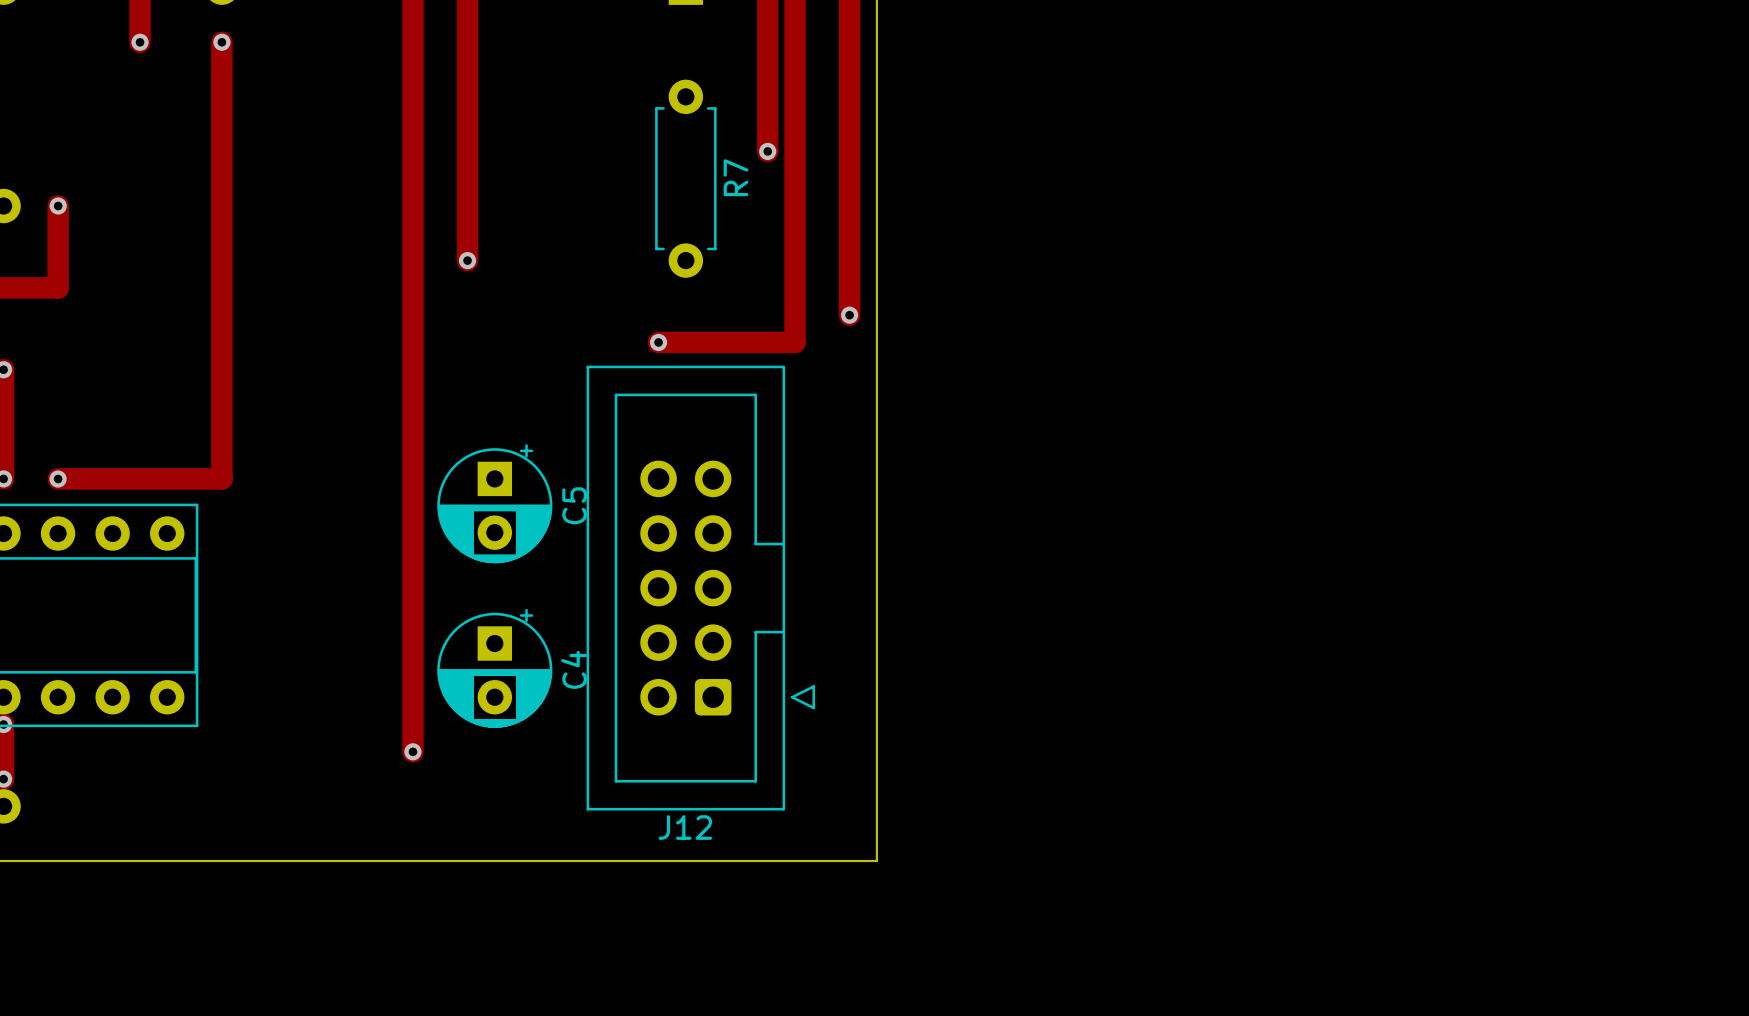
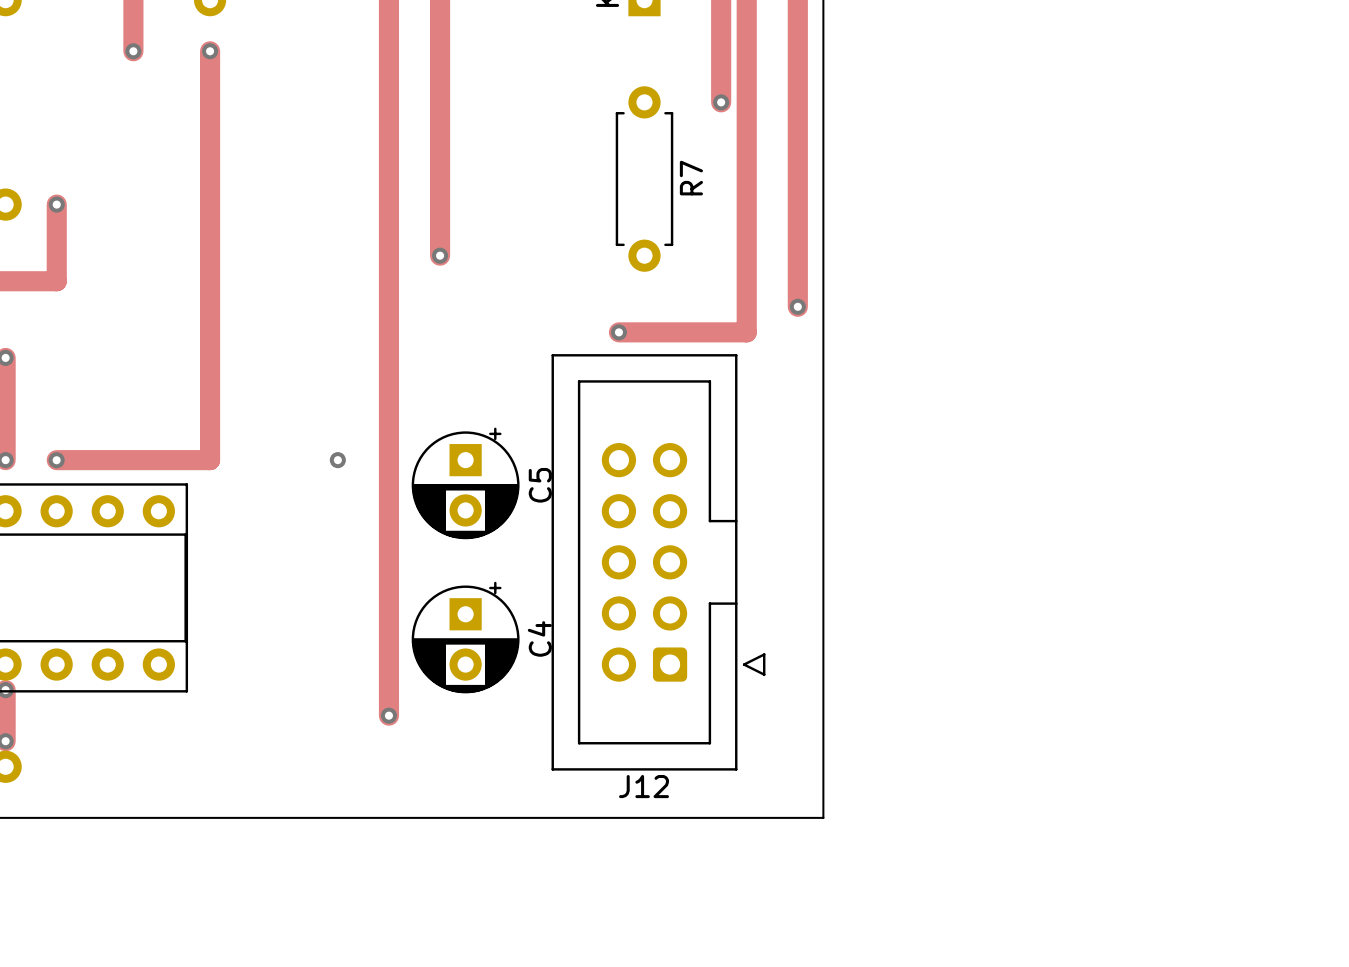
track: (767, 96) (767, 151) -> none
via position: (767, 151) -> (721, 102)
via: none -> (337, 460)

